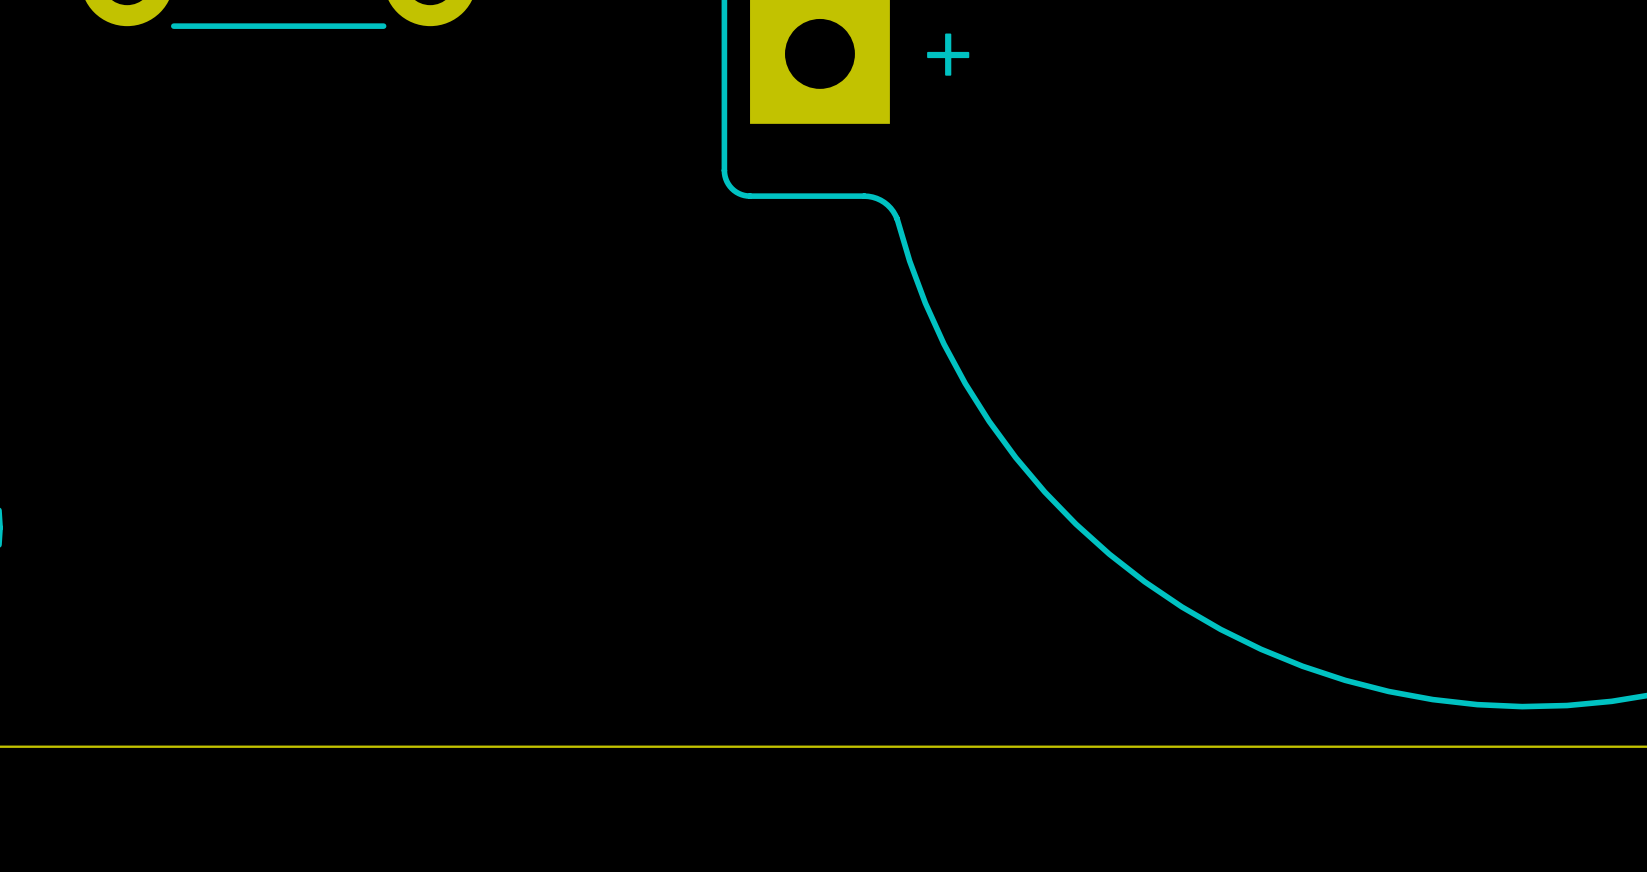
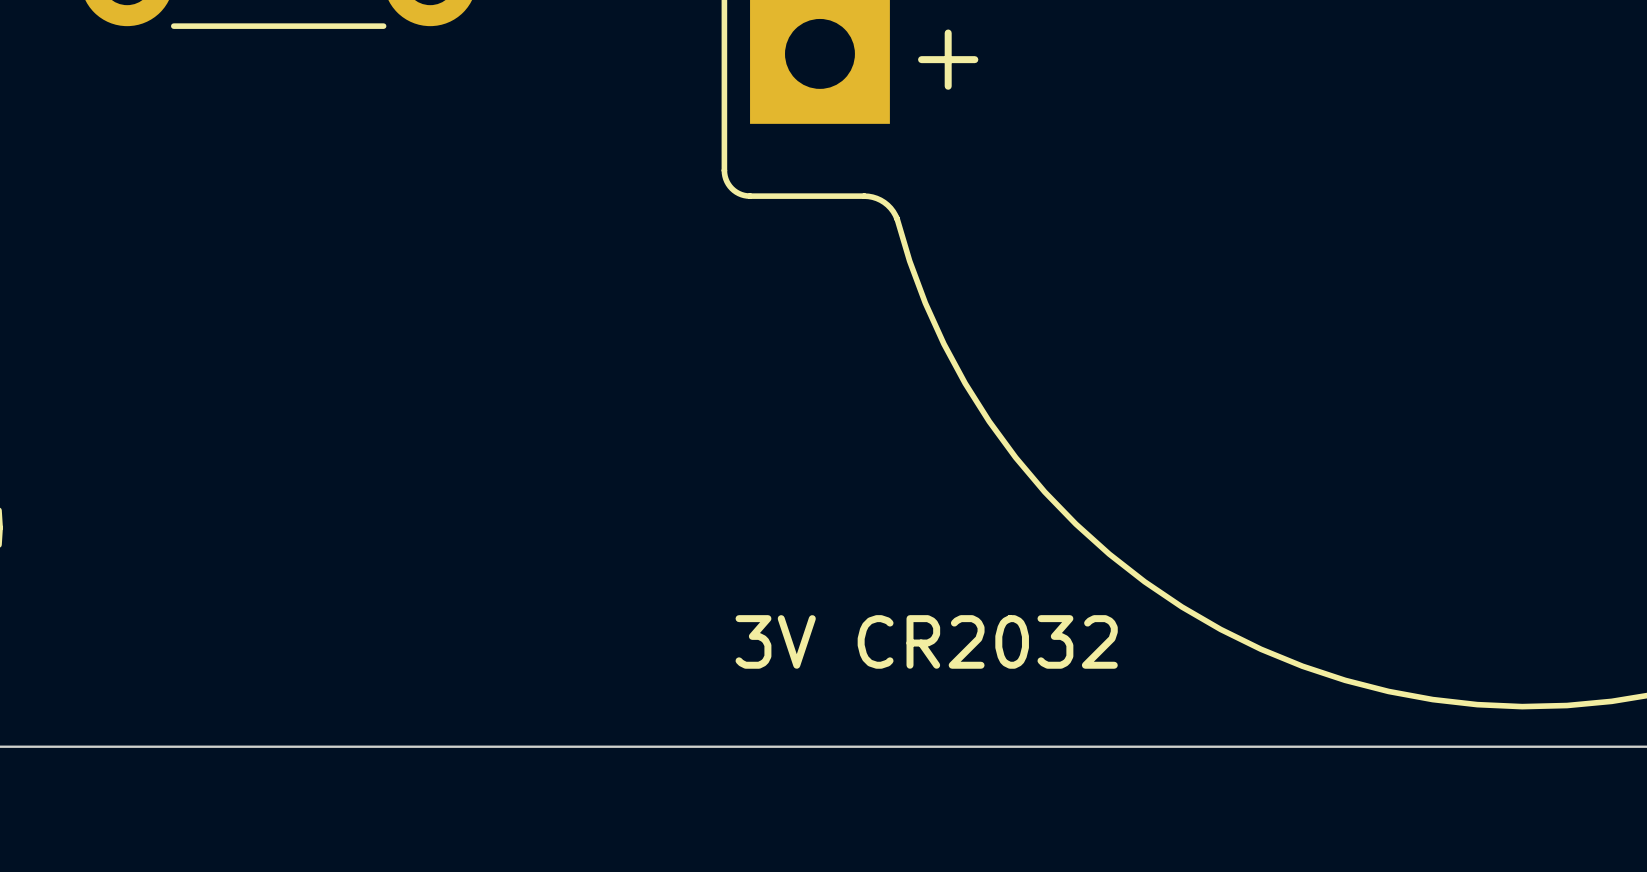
text: none -> 3V CR2032 (926, 641)

